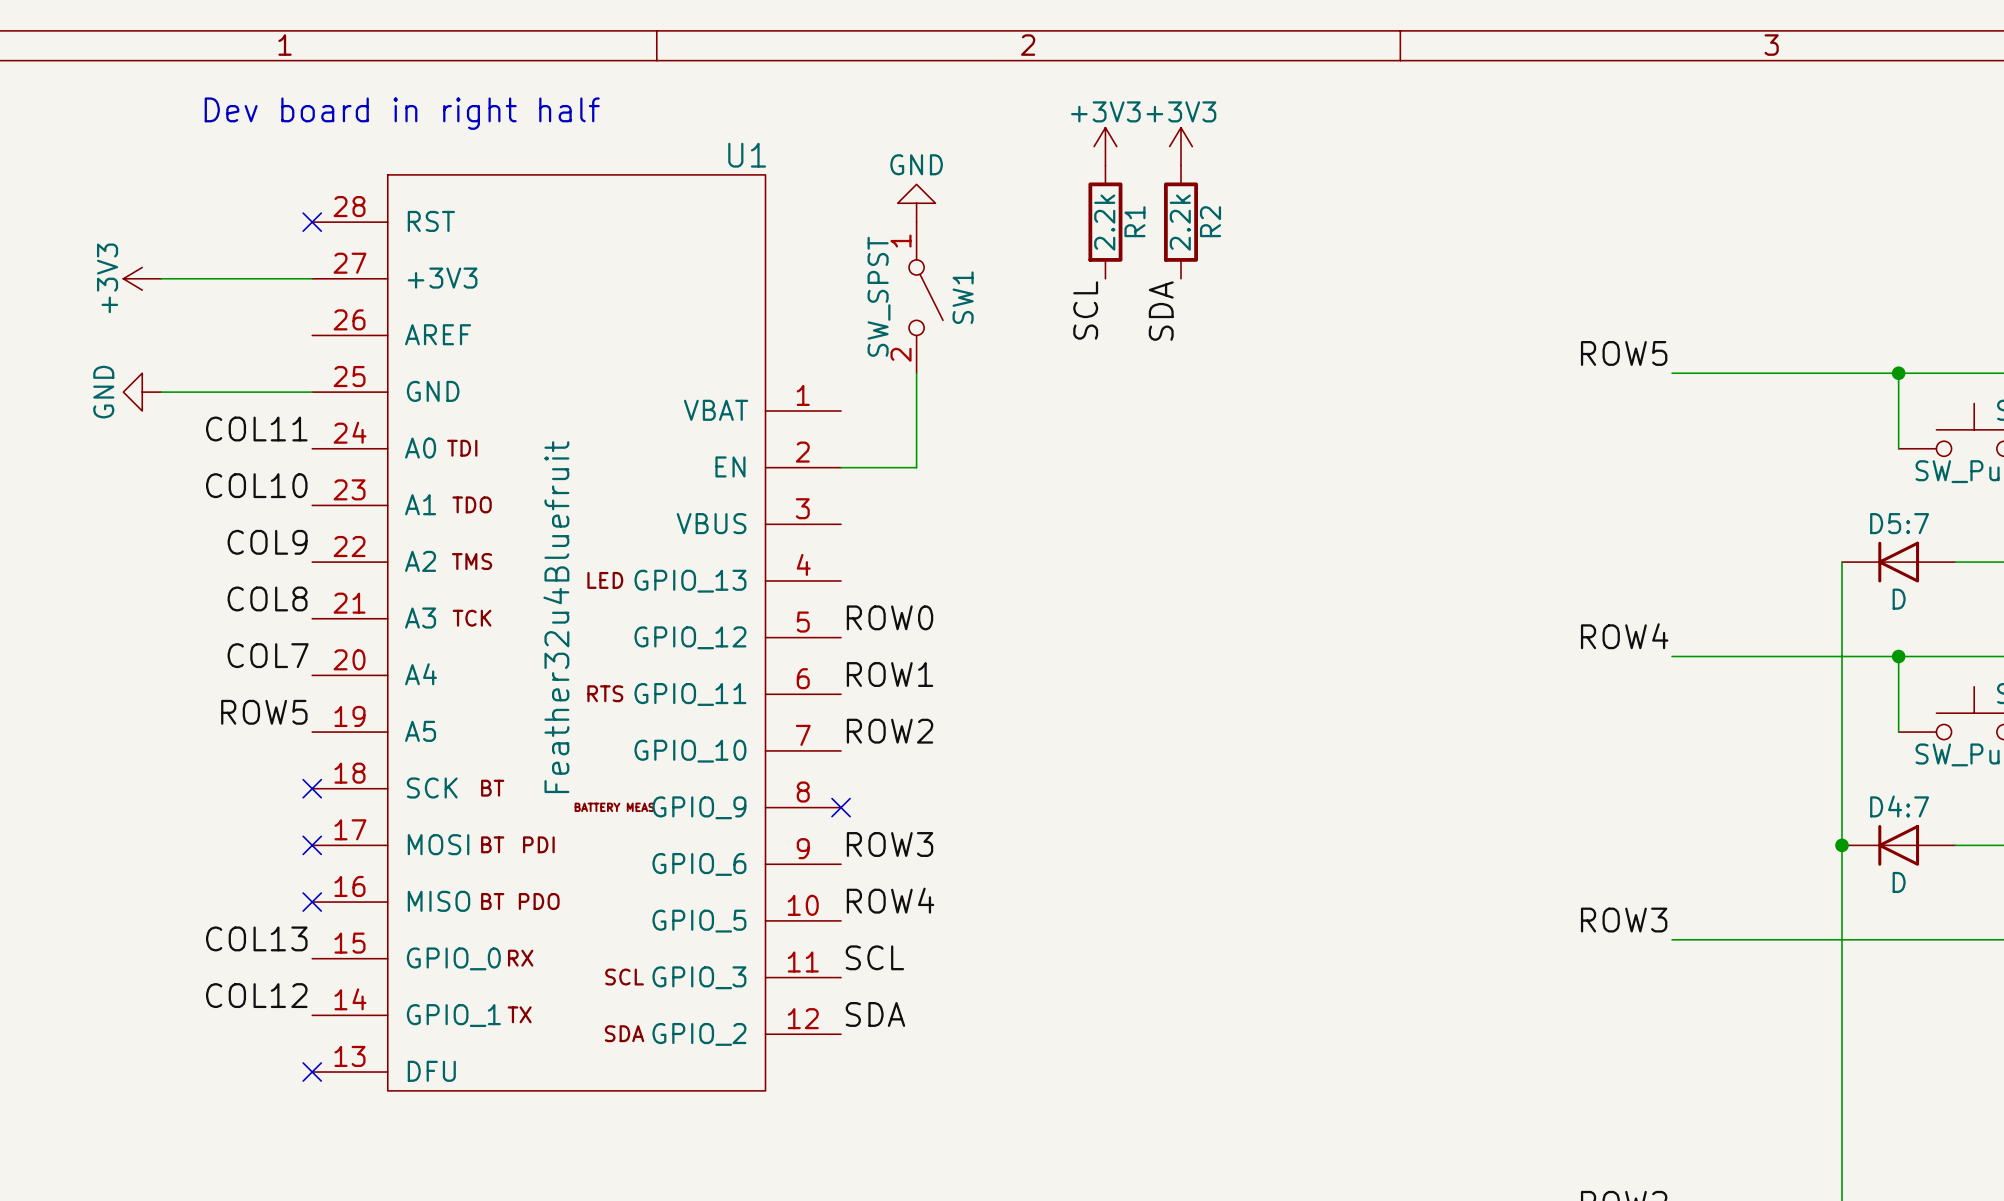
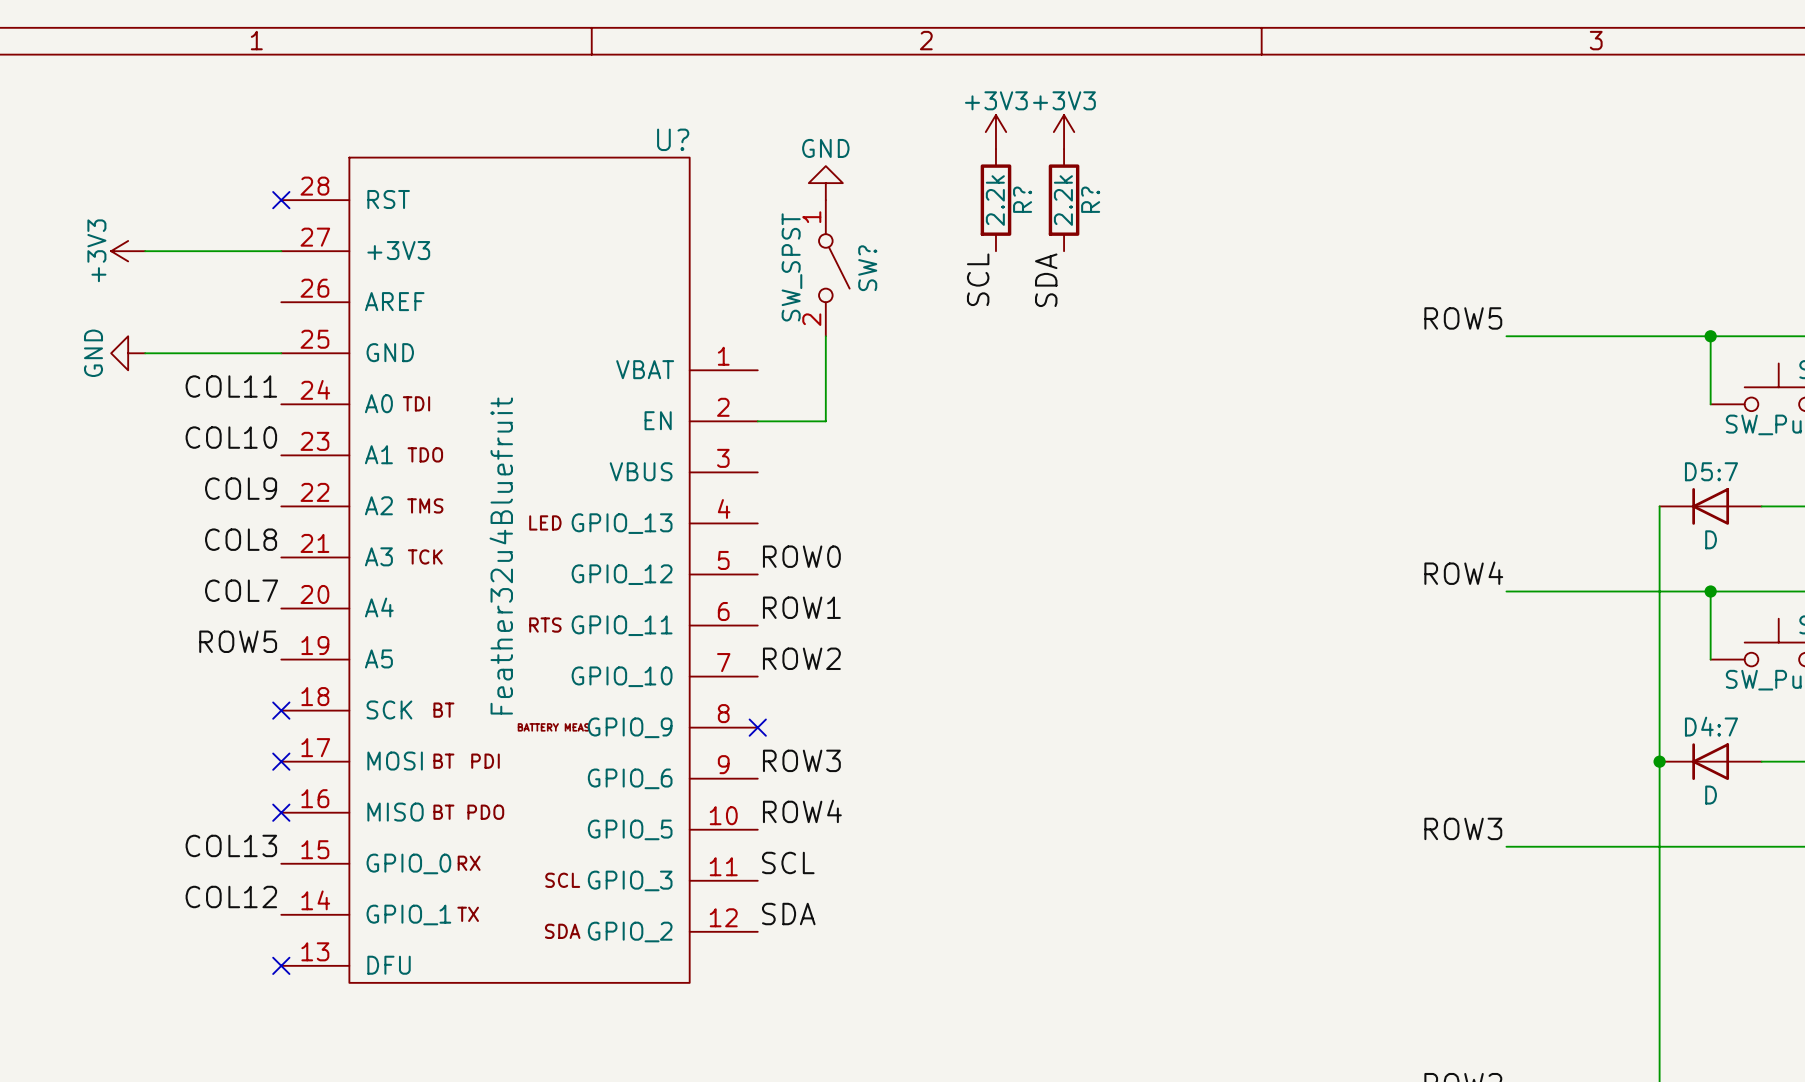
text: Dev board in right half (402, 113) -> none
U1 name: U1 (747, 155) -> U? (673, 139)
R1 name: R1 (1134, 221) -> R? (1022, 199)
R2 name: R2 (1210, 221) -> R? (1090, 199)
SW1 name: SW1 (963, 297) -> SW? (867, 268)

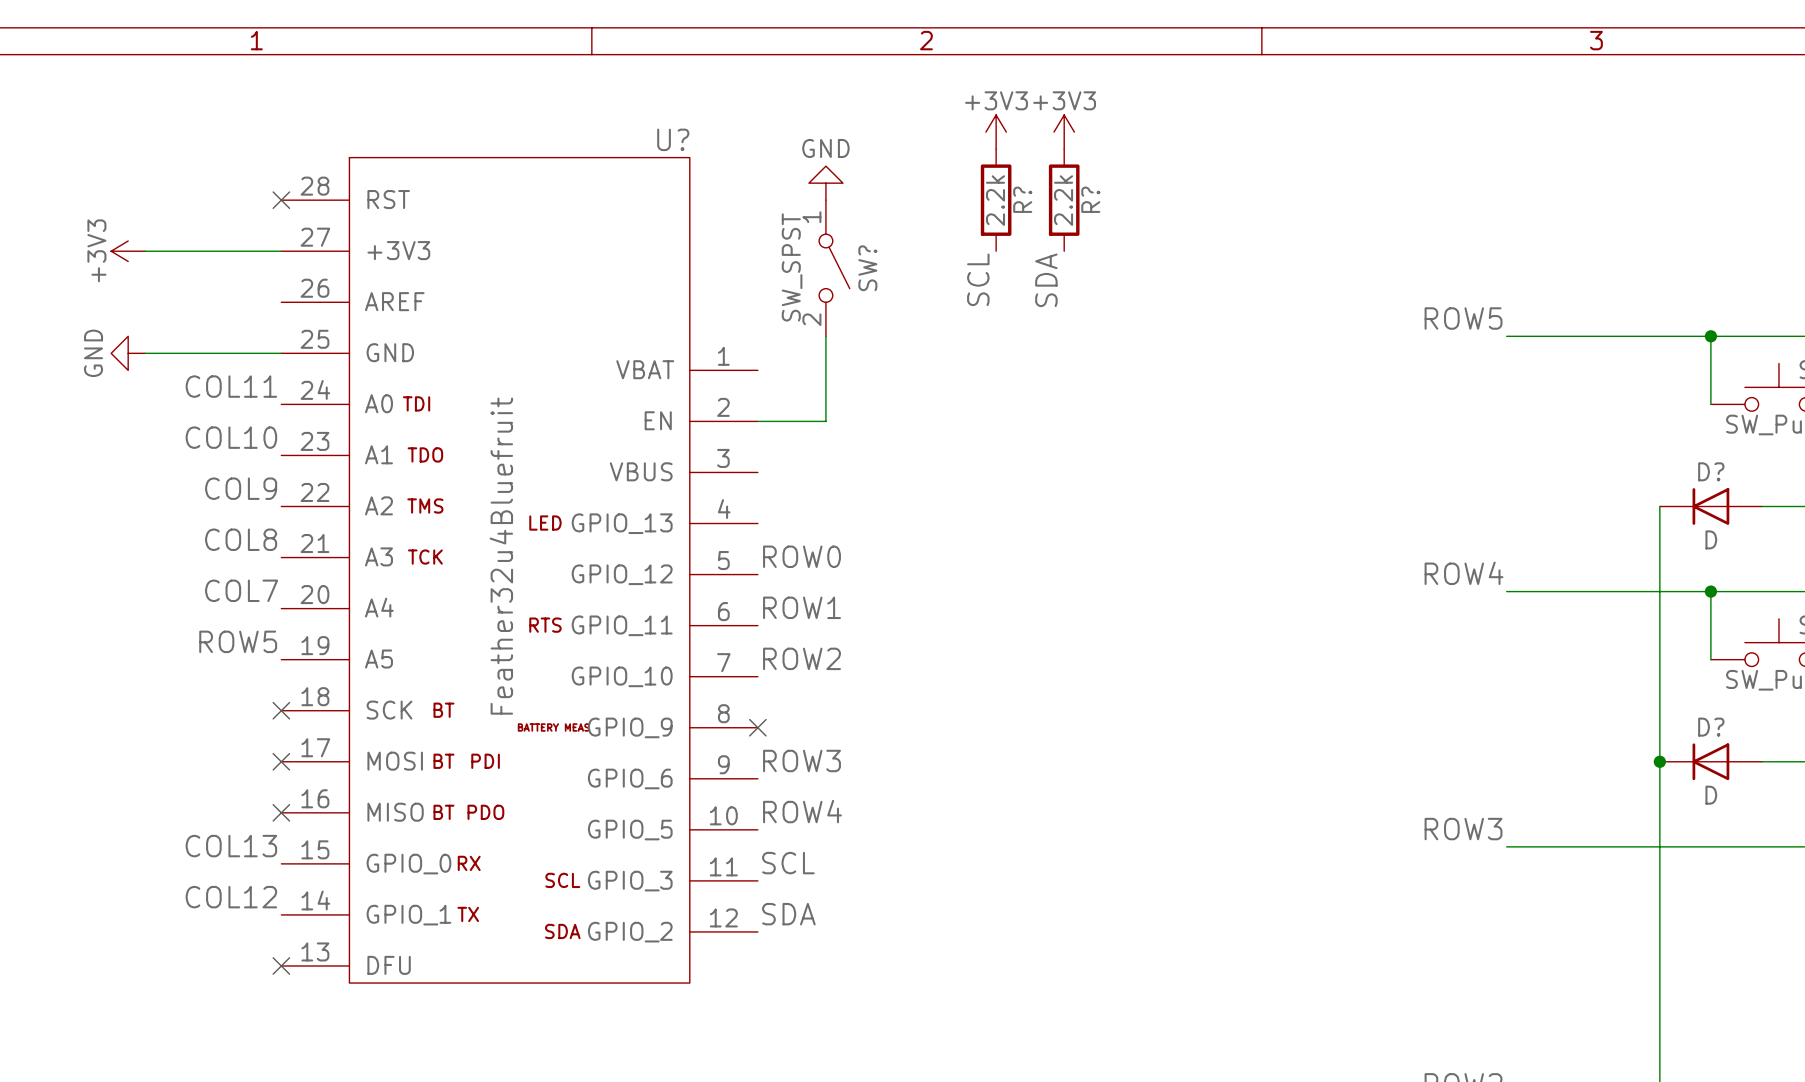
D? name: D5:7 (1711, 471) -> D? (1711, 471)
D? name: D4:7 (1711, 726) -> D? (1711, 727)

